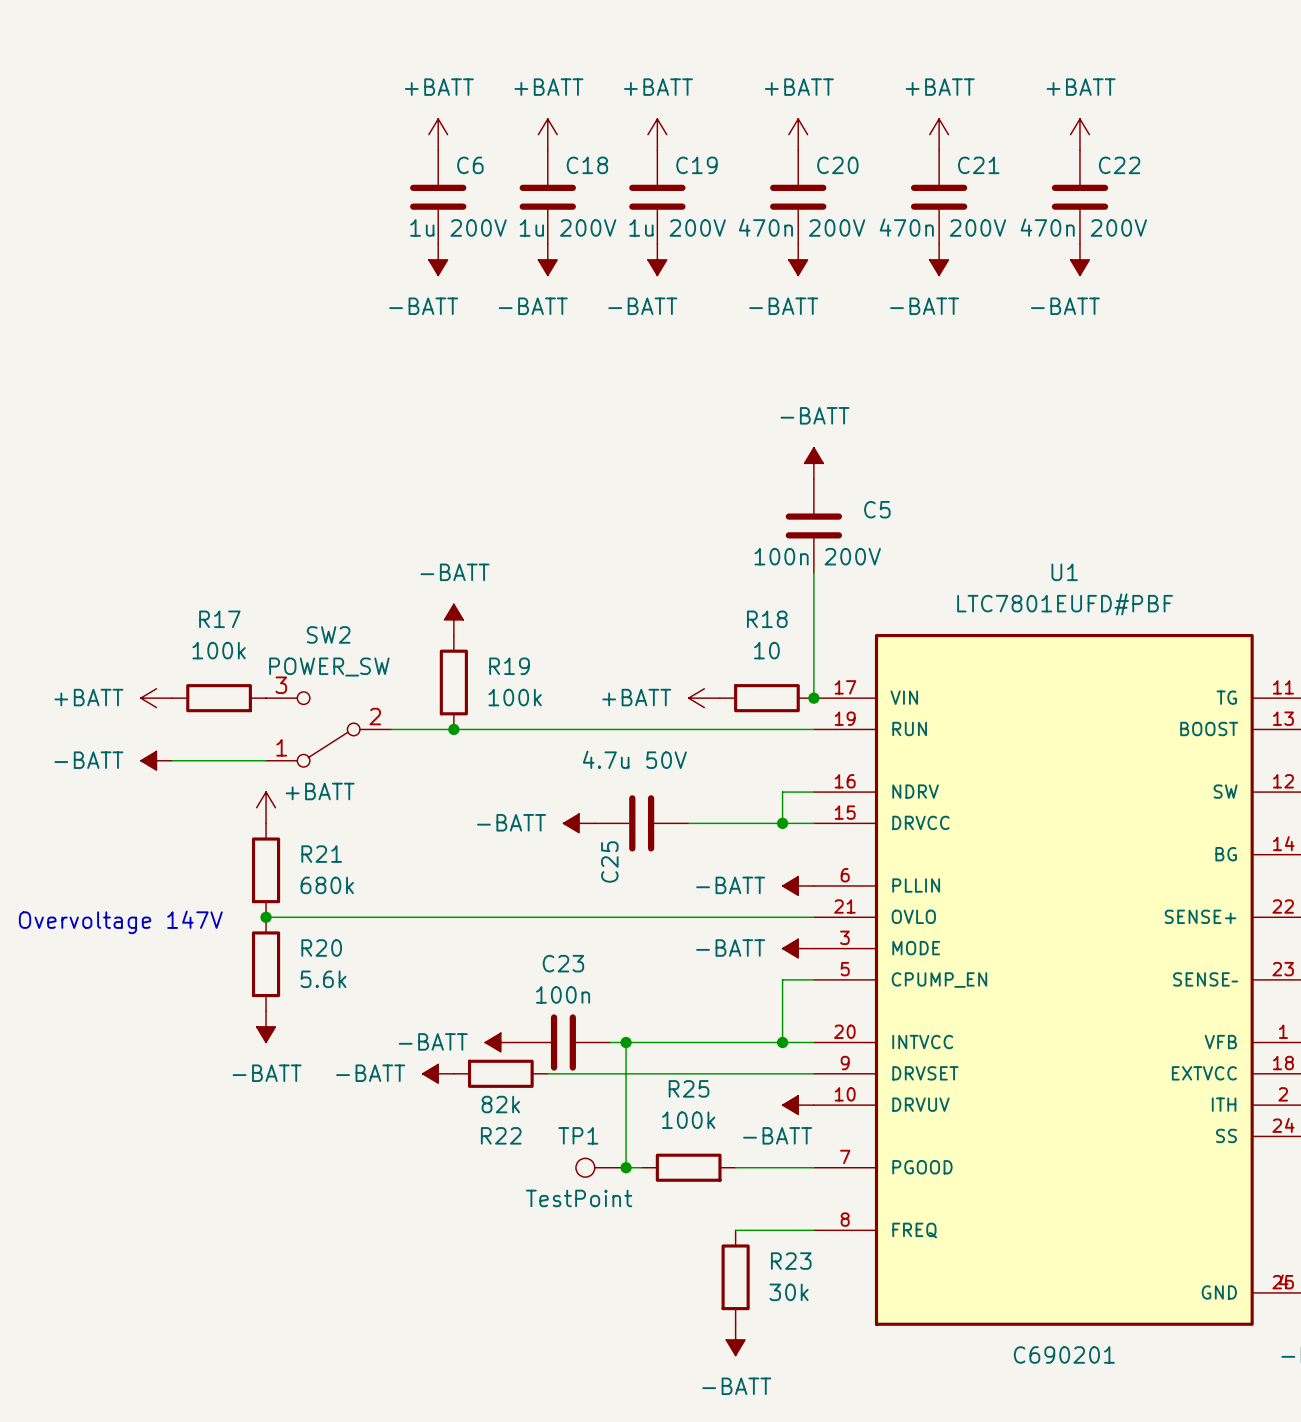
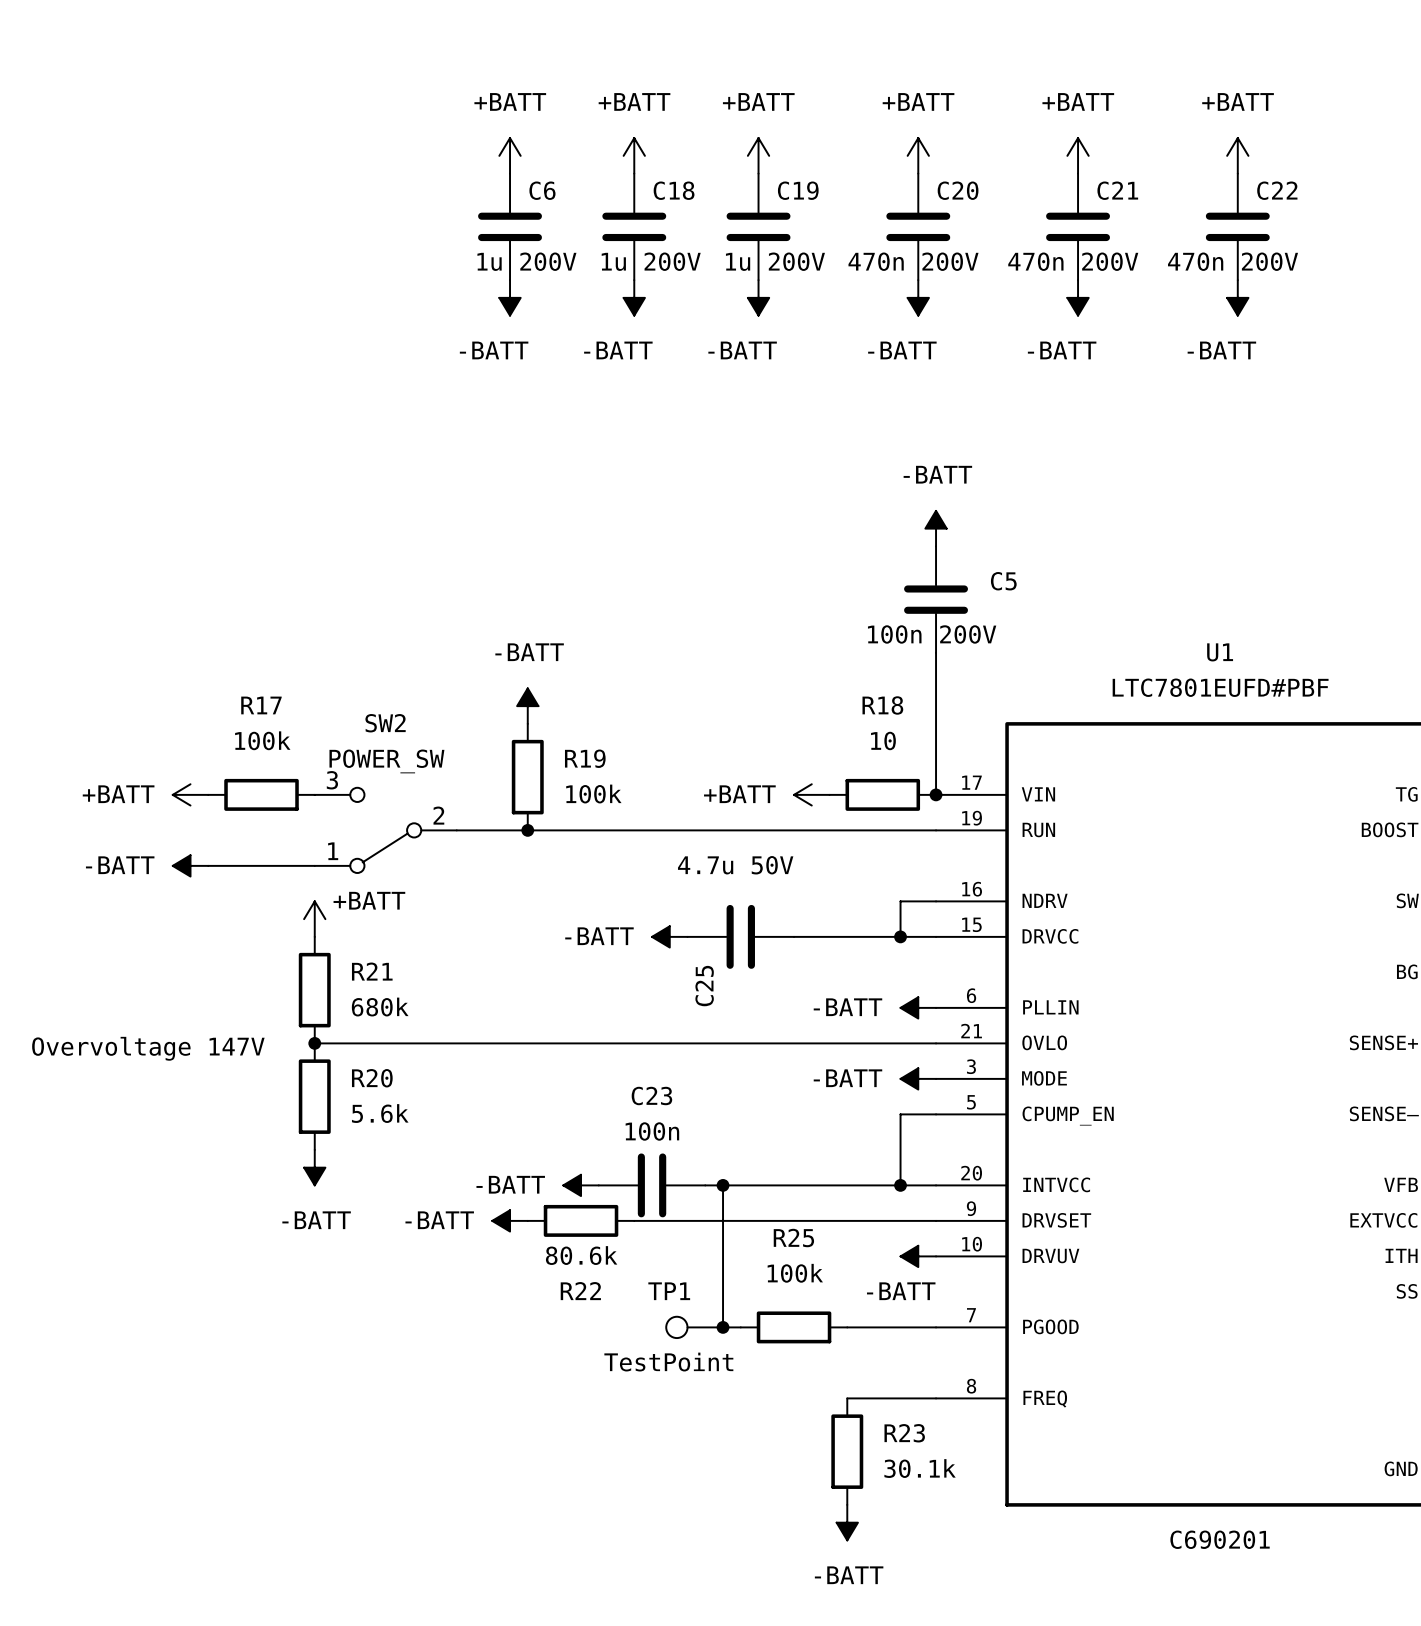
R22 value: 82k (500, 1104) -> 80.6k (581, 1255)
R23 value: 30k (789, 1292) -> 30.1k (920, 1468)

